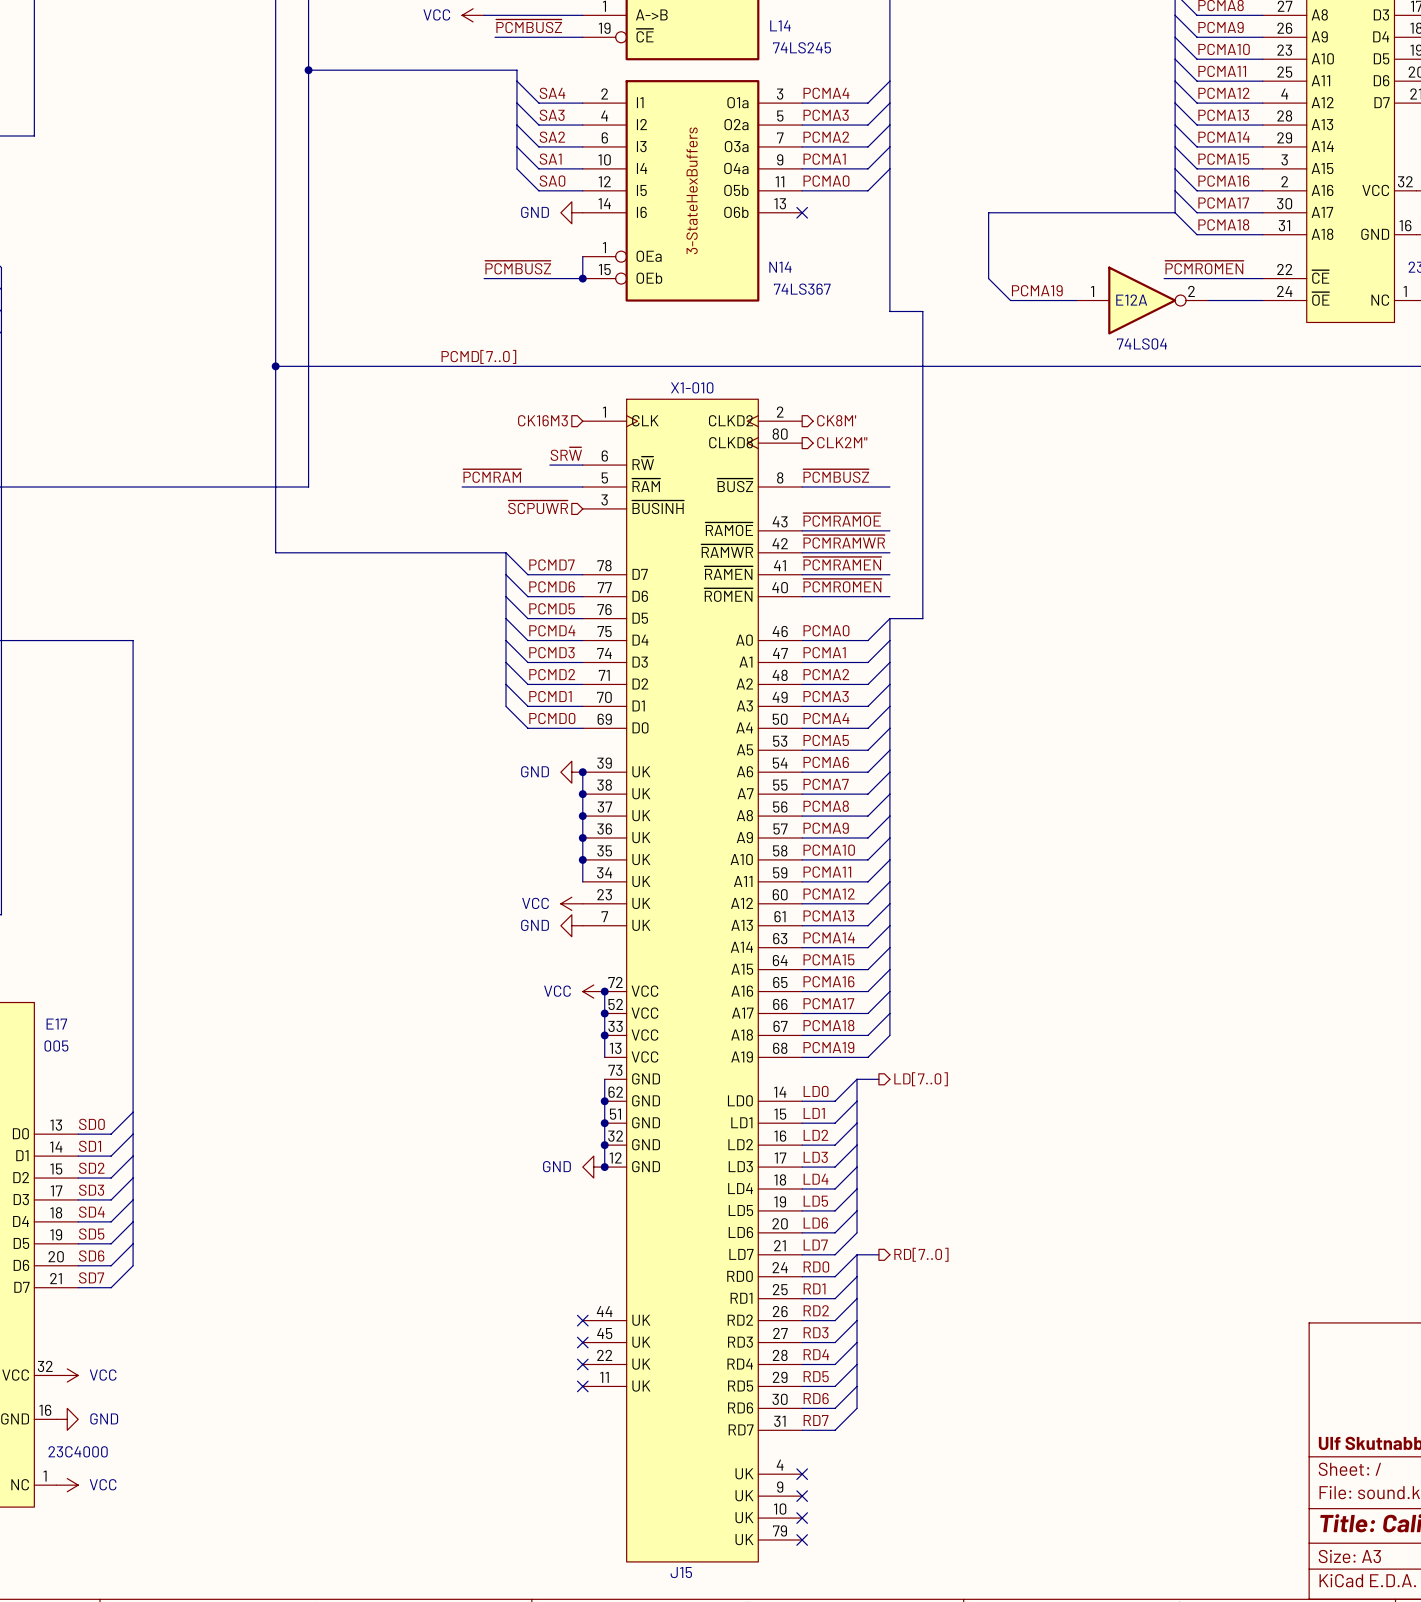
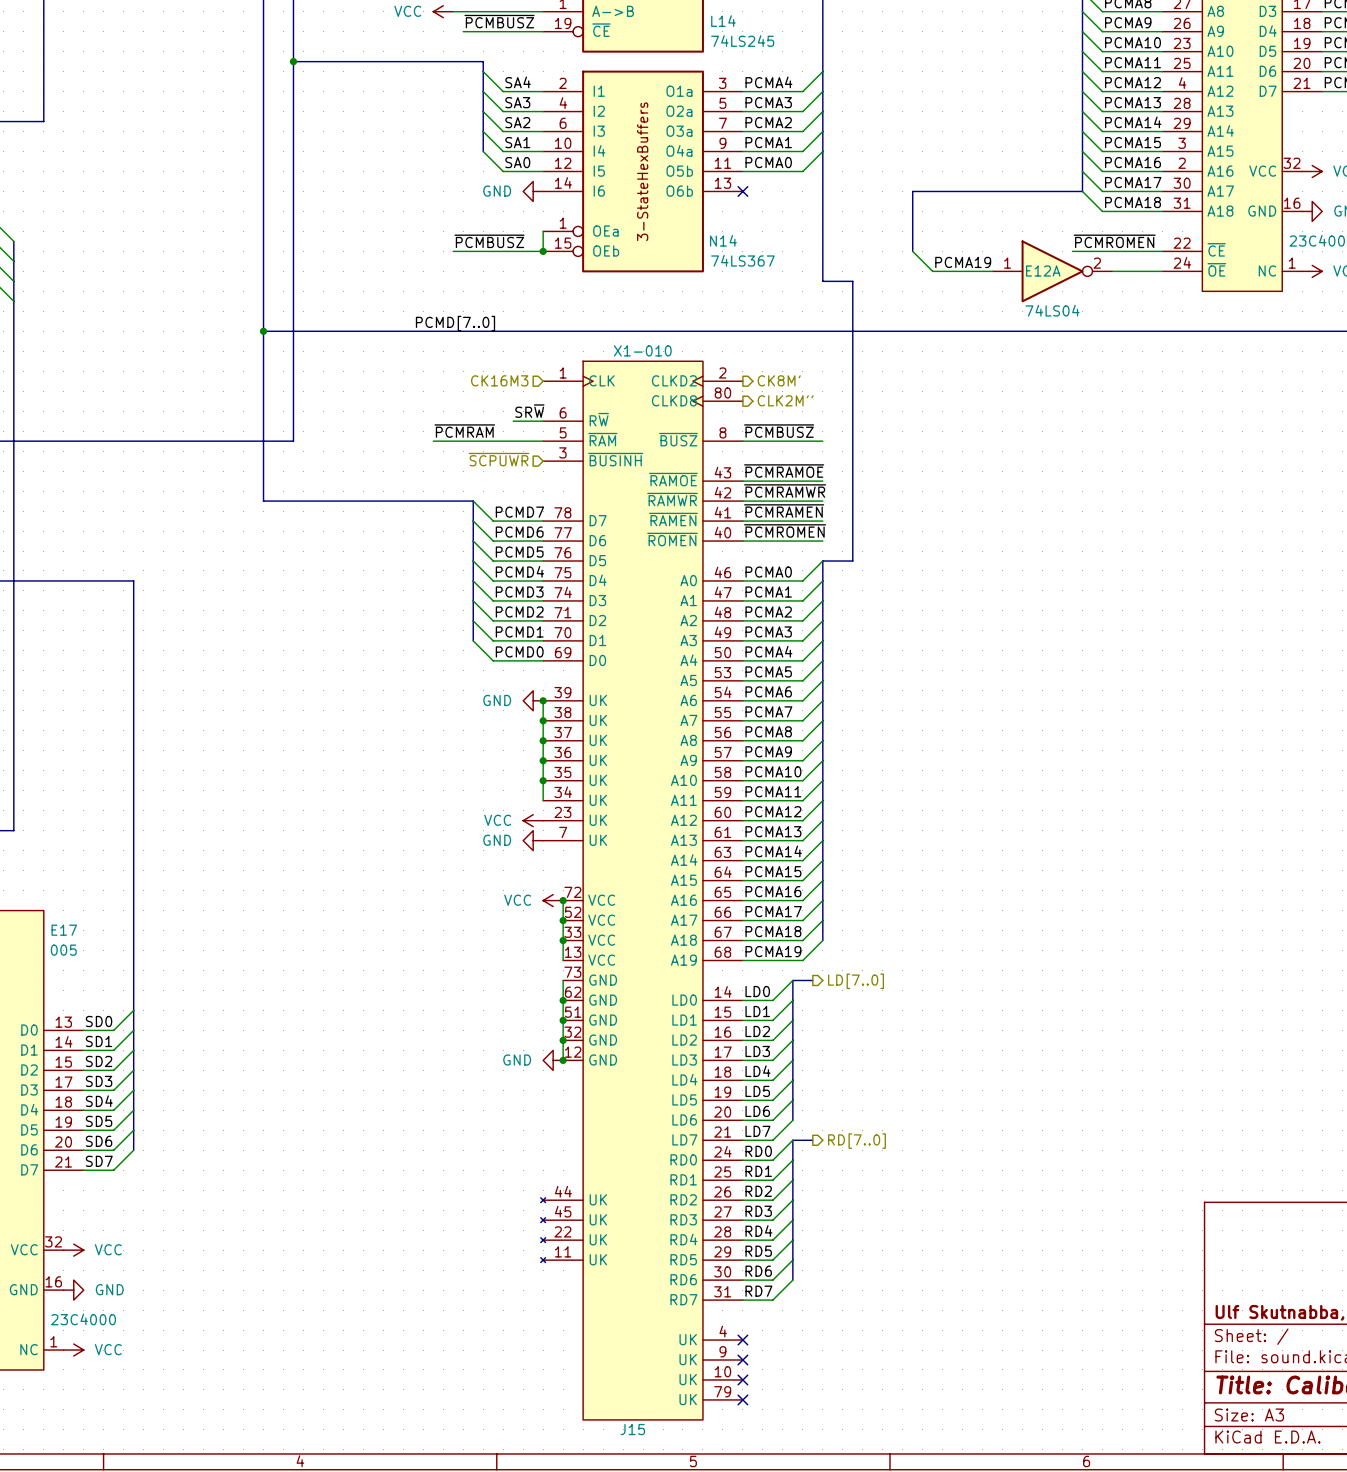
J15 symbol: [582, 399, 803, 1562] -> [540, 361, 743, 1420]
no-connect mark: (582, 1320) -> none
no-connect mark: (582, 1342) -> none
no-connect mark: (582, 1364) -> none
no-connect mark: (582, 1386) -> none

